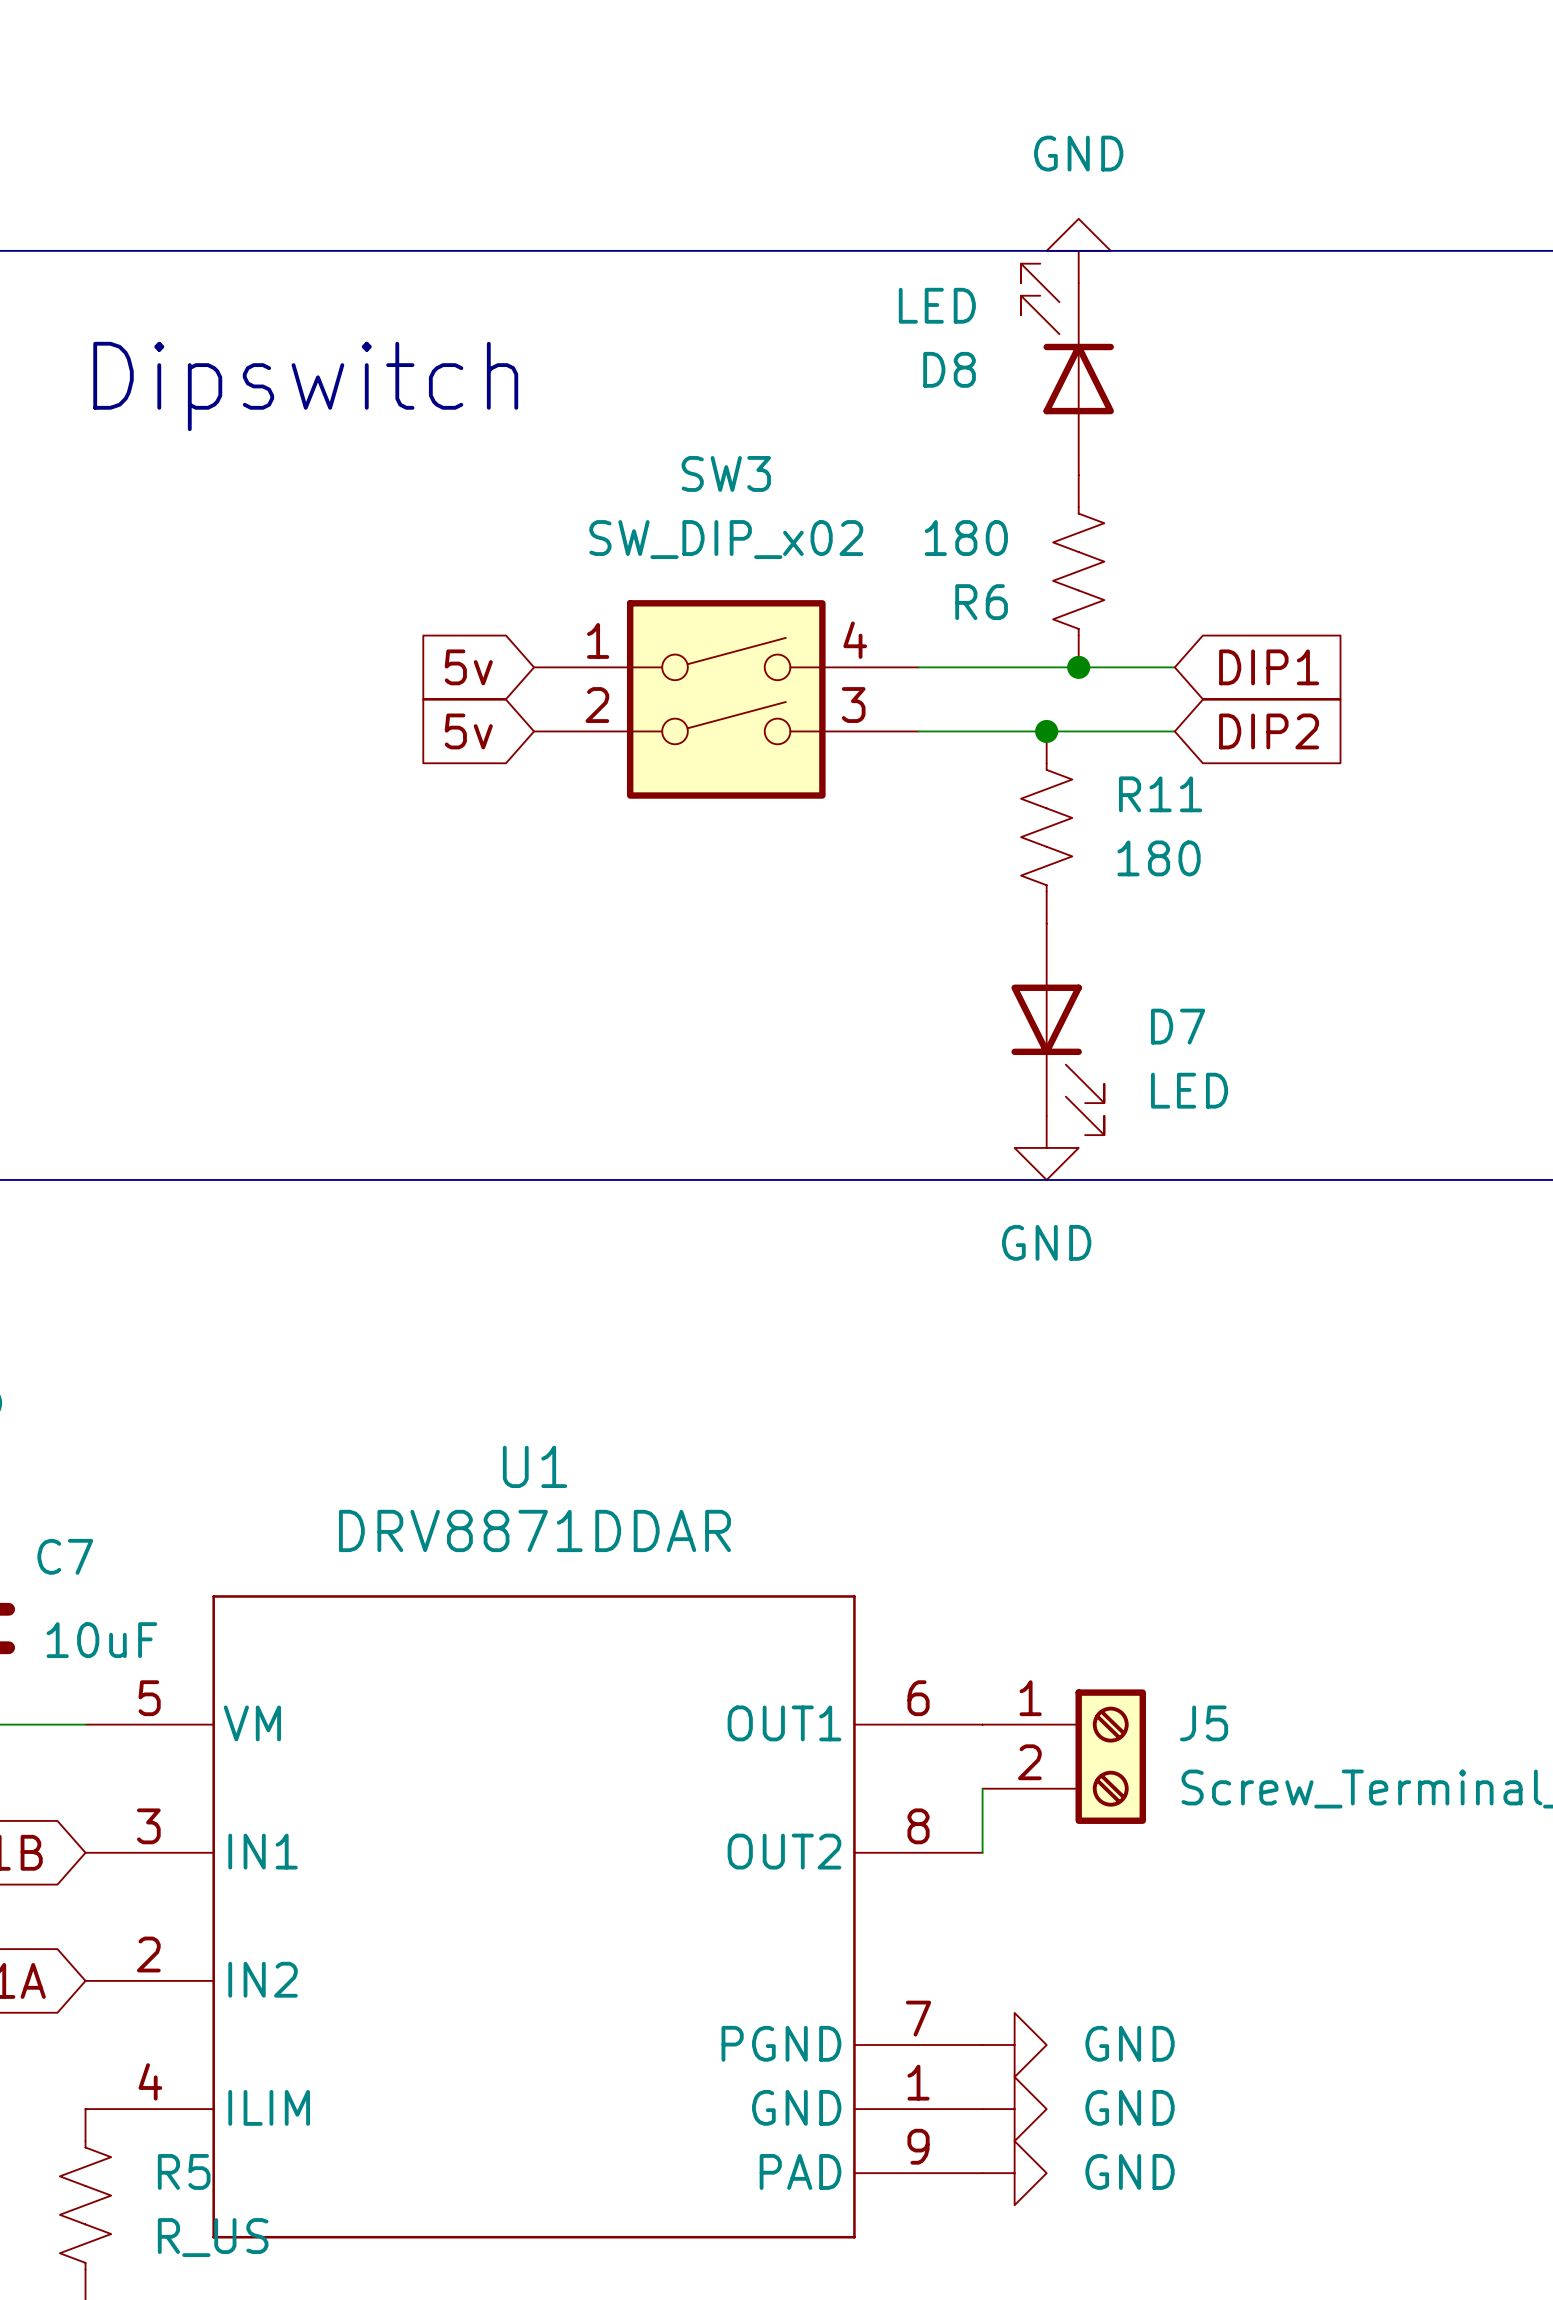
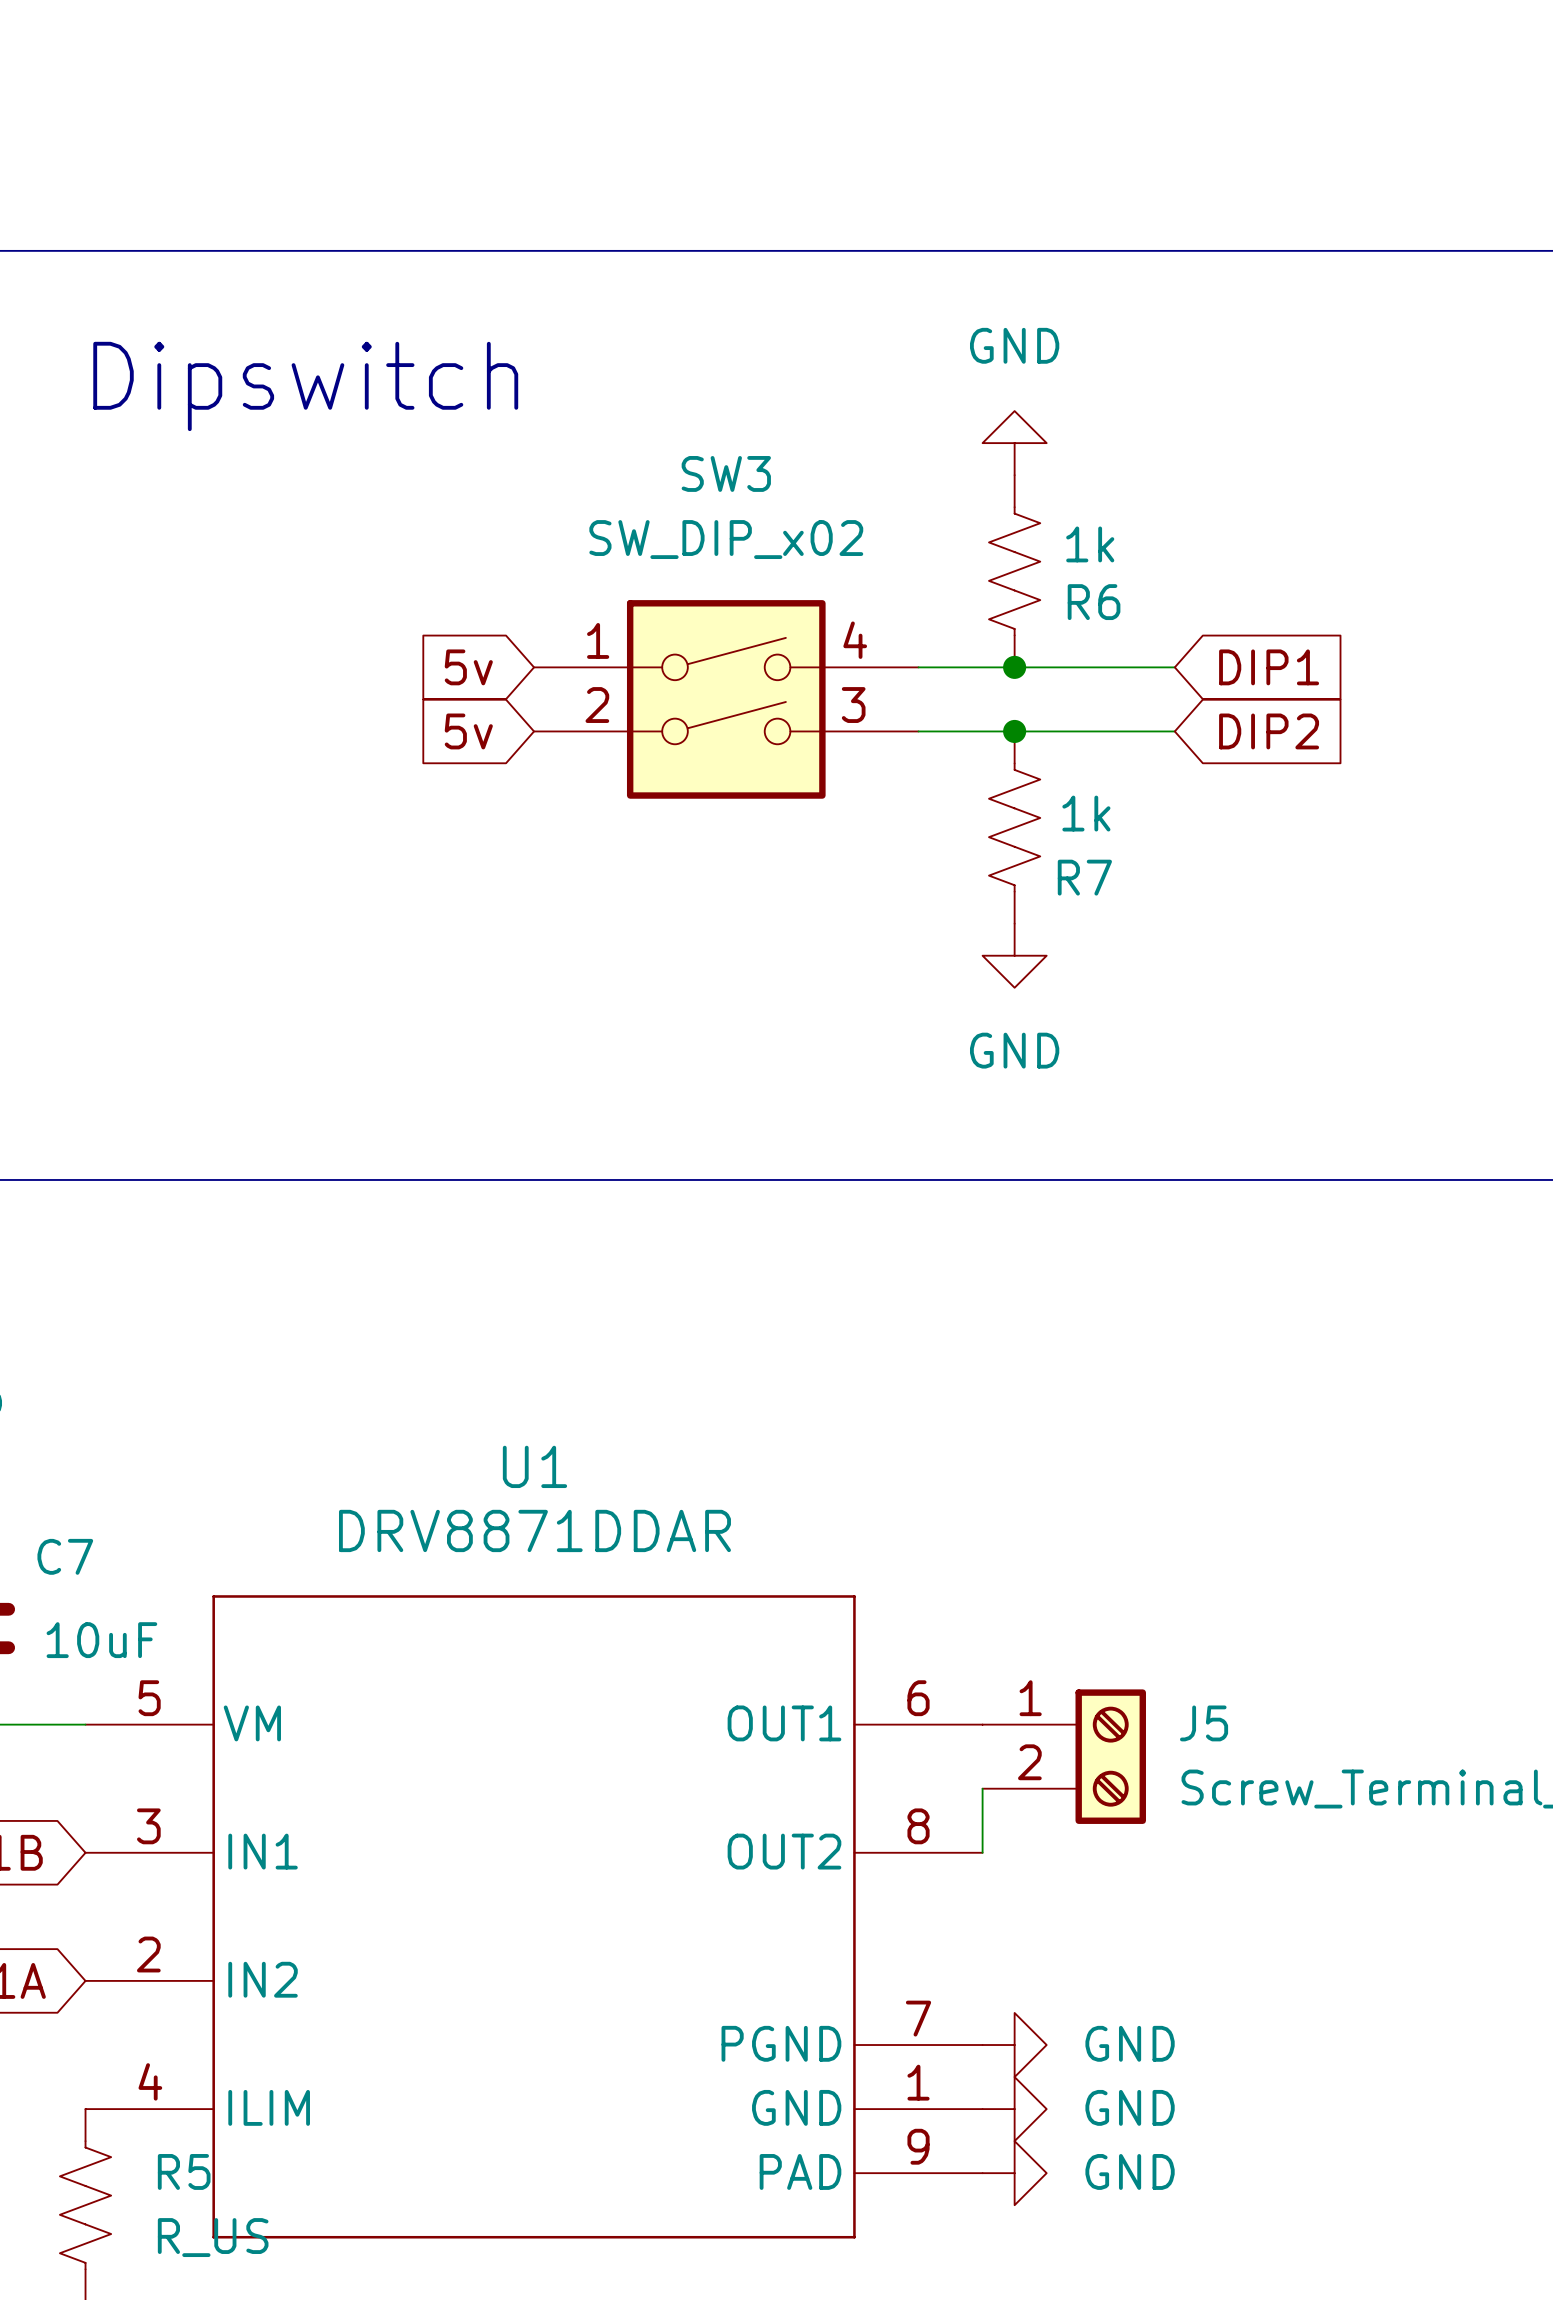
power symbol position: GND (1078, 250) -> GND (1014, 443)
D8: LED (1067, 369) -> none
R6 value: 180 (966, 538) -> 1k (1090, 544)
R6 position: (1078, 571) -> (1014, 571)
R6 name position: R6 (981, 602) -> R6 (1094, 602)
junction: none -> (1014, 667)
junction: (1078, 667) -> none
junction position: (1046, 731) -> (1014, 731)
R7: none -> 1k (1014, 827)
R11: 180 (1046, 827) -> none
D7: LED (1057, 1029) -> none
power symbol position: GND (1046, 1147) -> GND (1014, 955)

